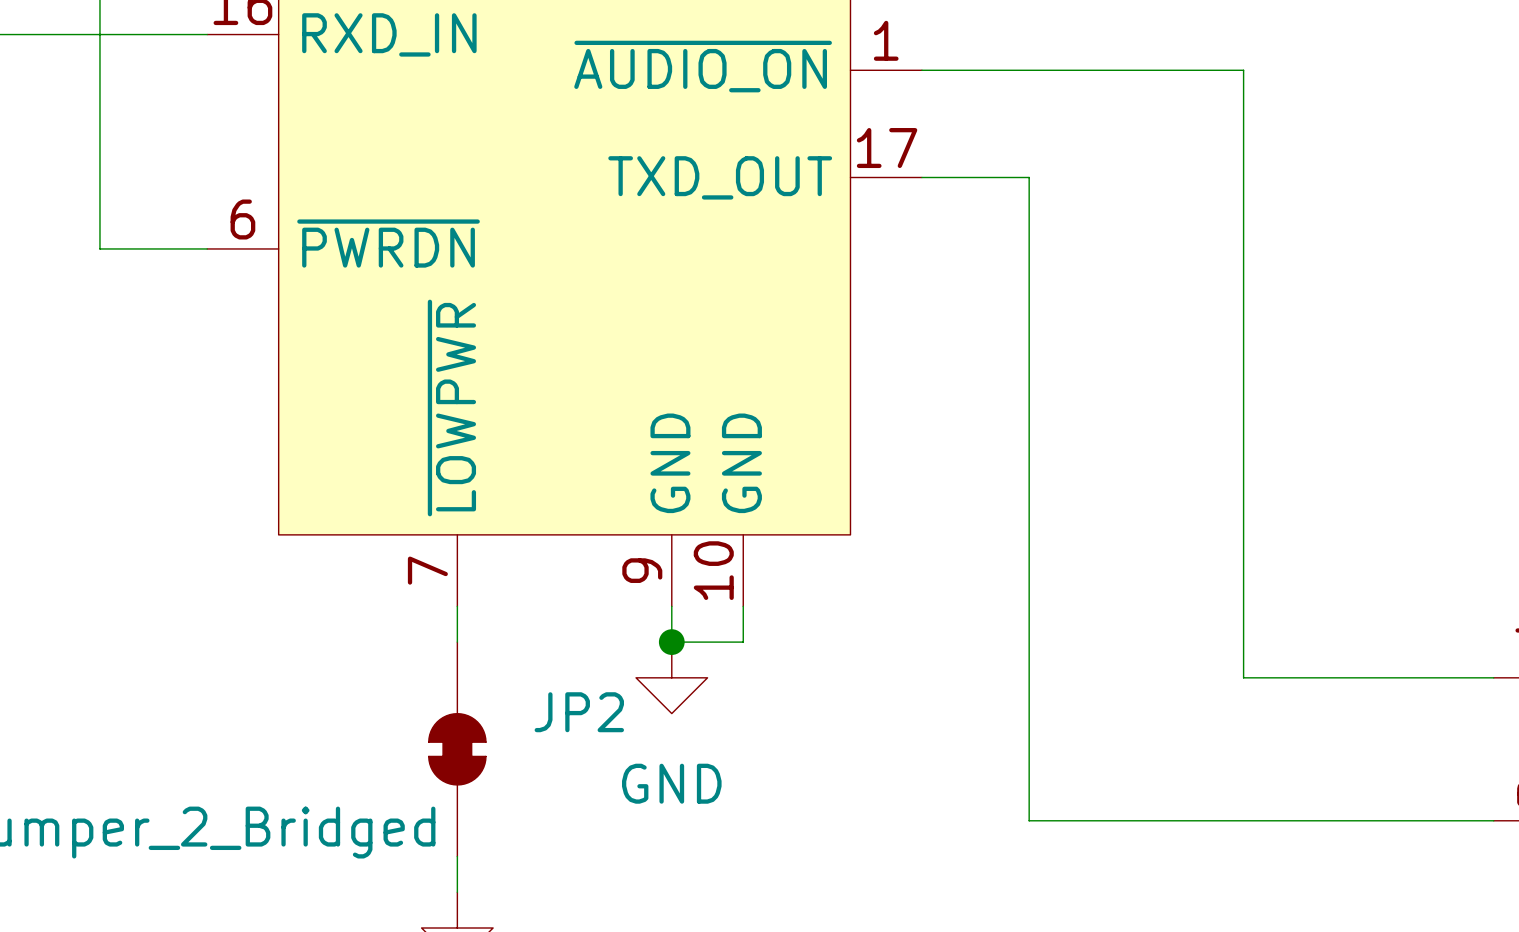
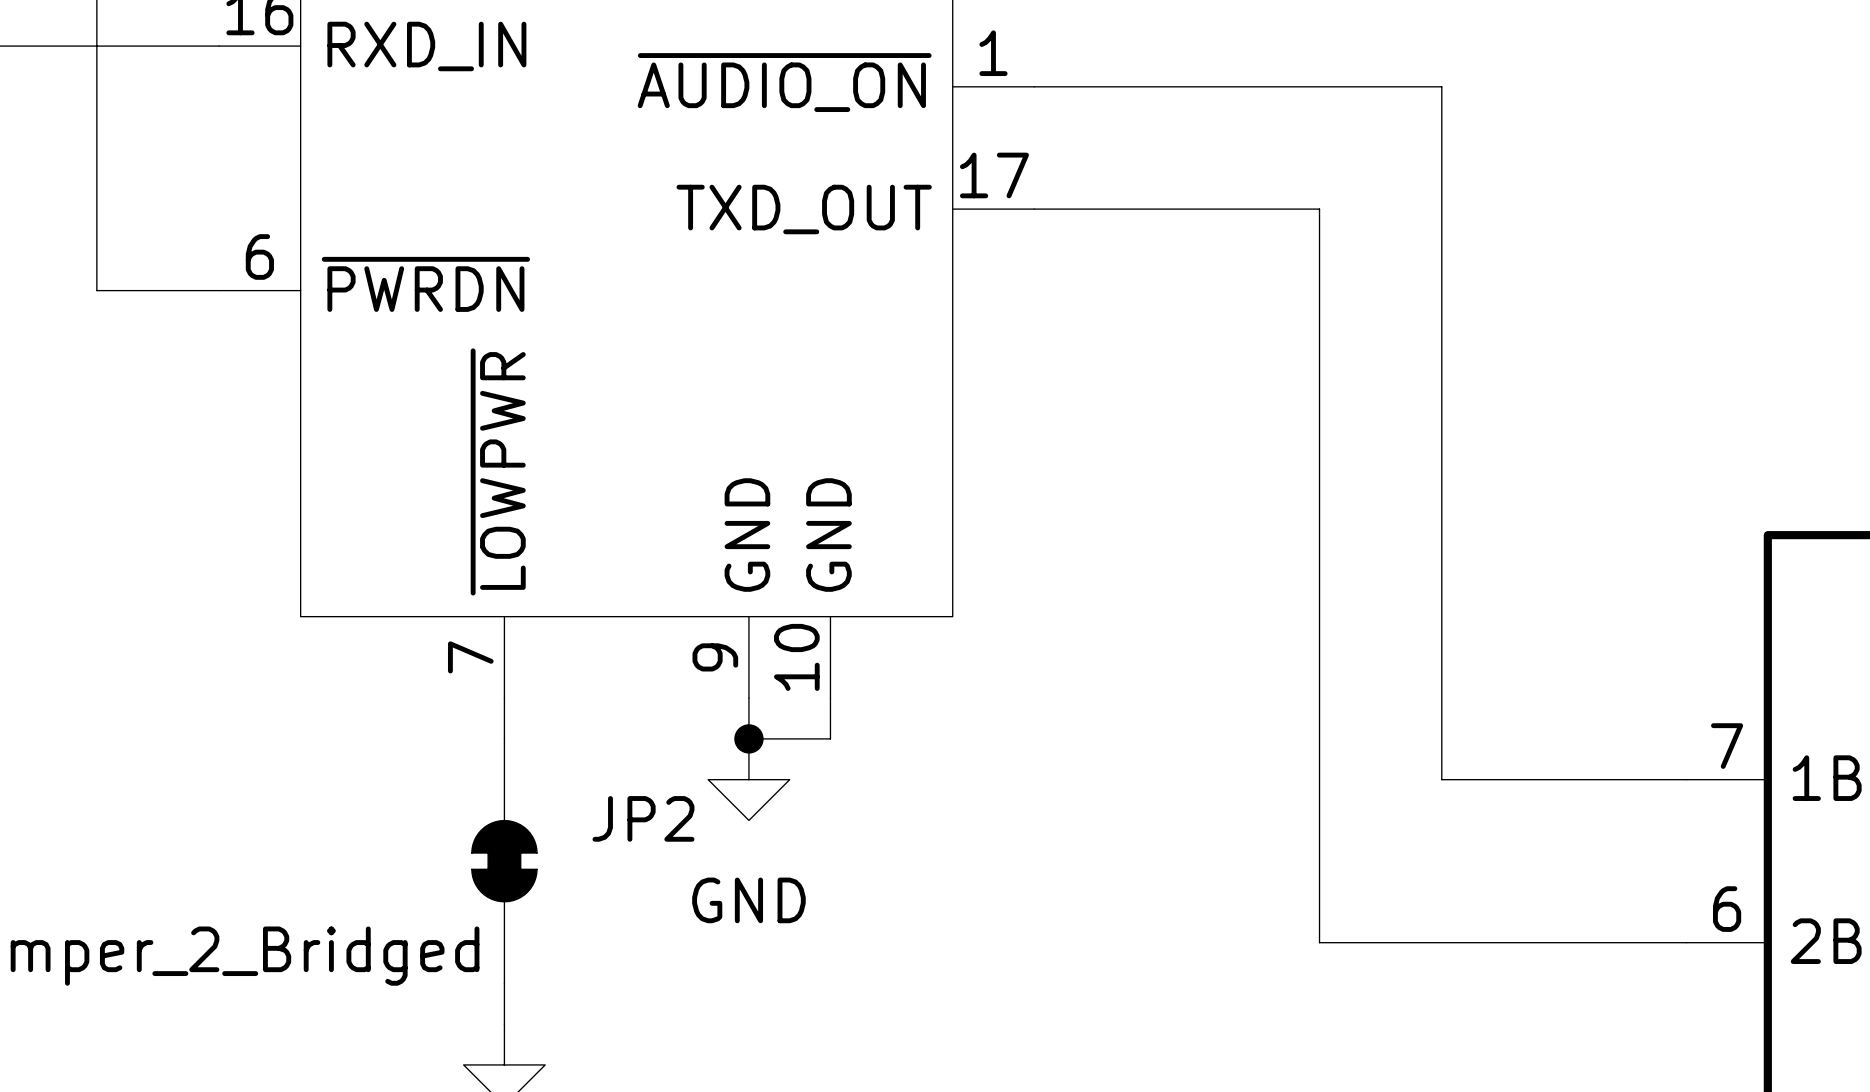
wire: (1243, 70) (1243, 677) (1279, 677) -> (1401, 86) (1441, 86) (1441, 779)
wire: (1029, 177) (1029, 820) (1172, 820) -> (1156, 209) (1319, 209) (1319, 942)

